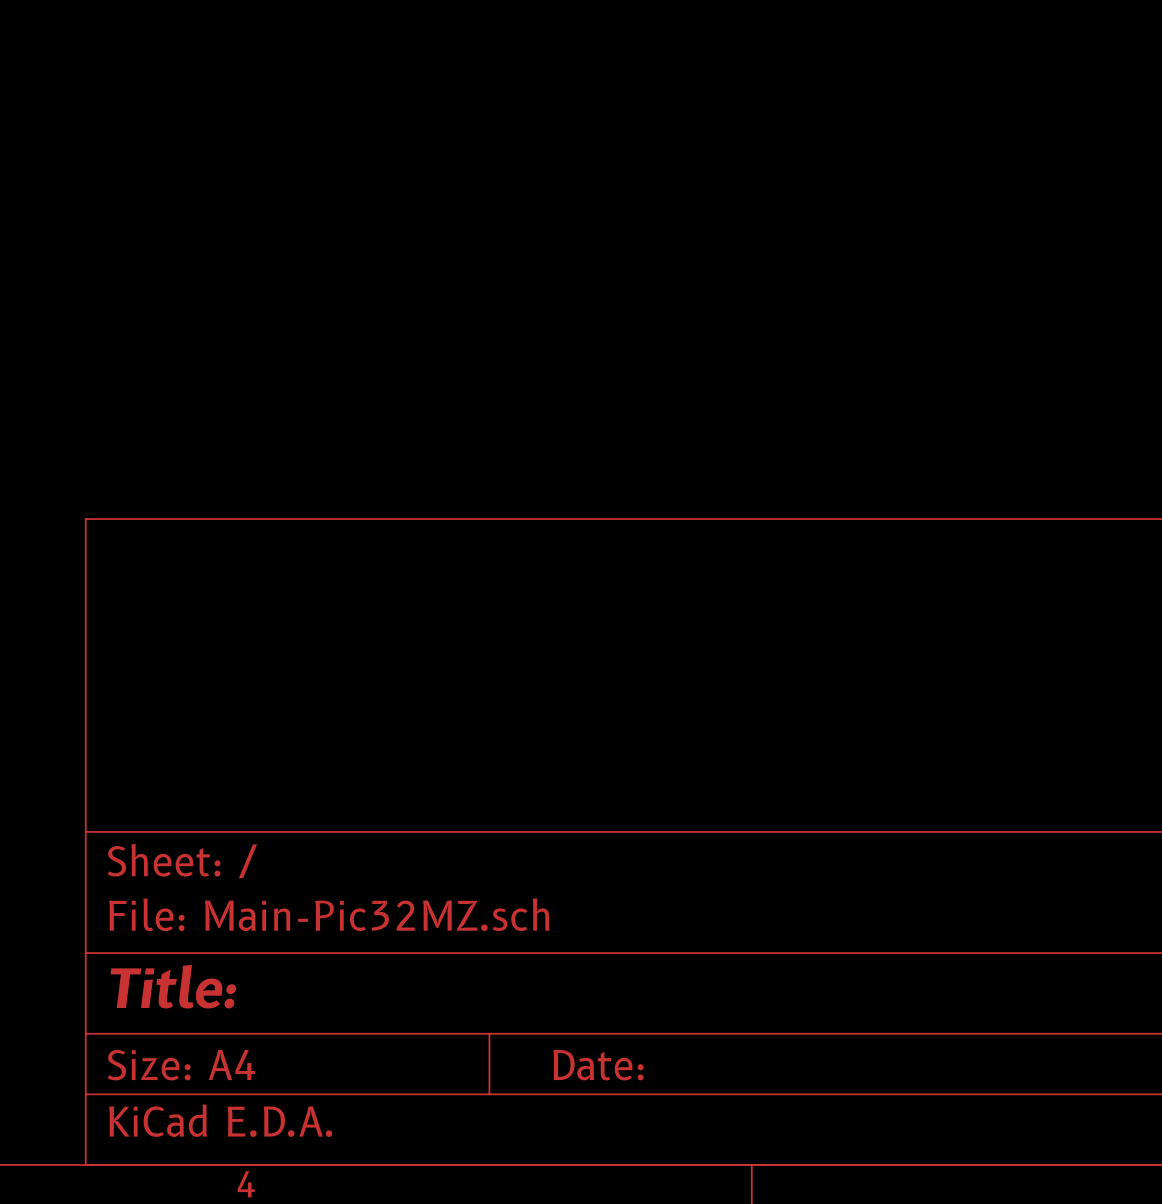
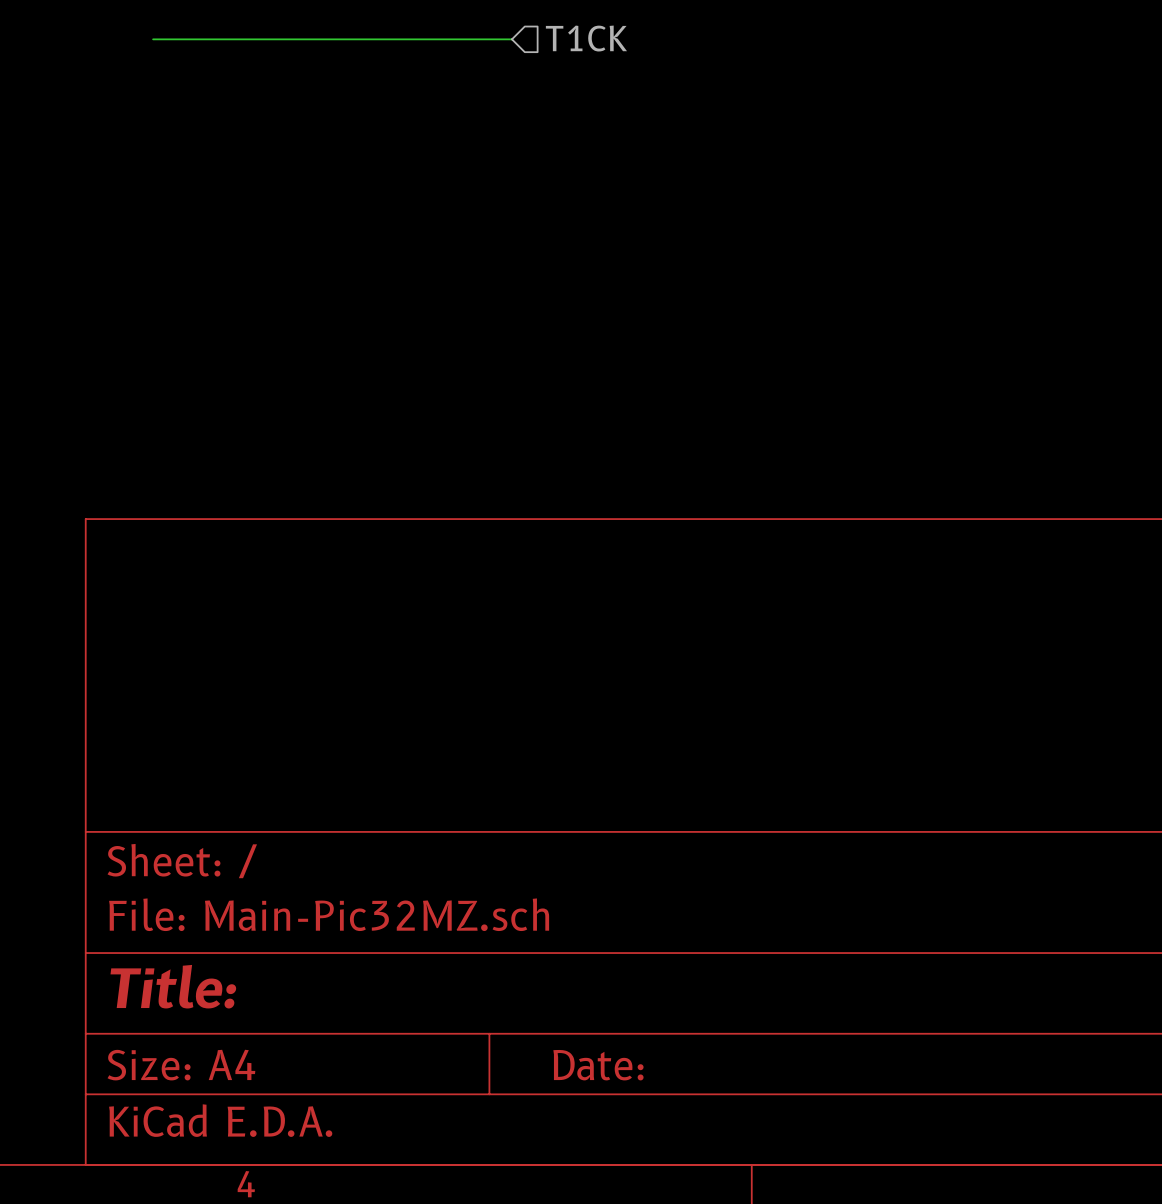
hierarchical label: none -> T1CK (586, 38)
wire: none -> (153, 39) (511, 39)

